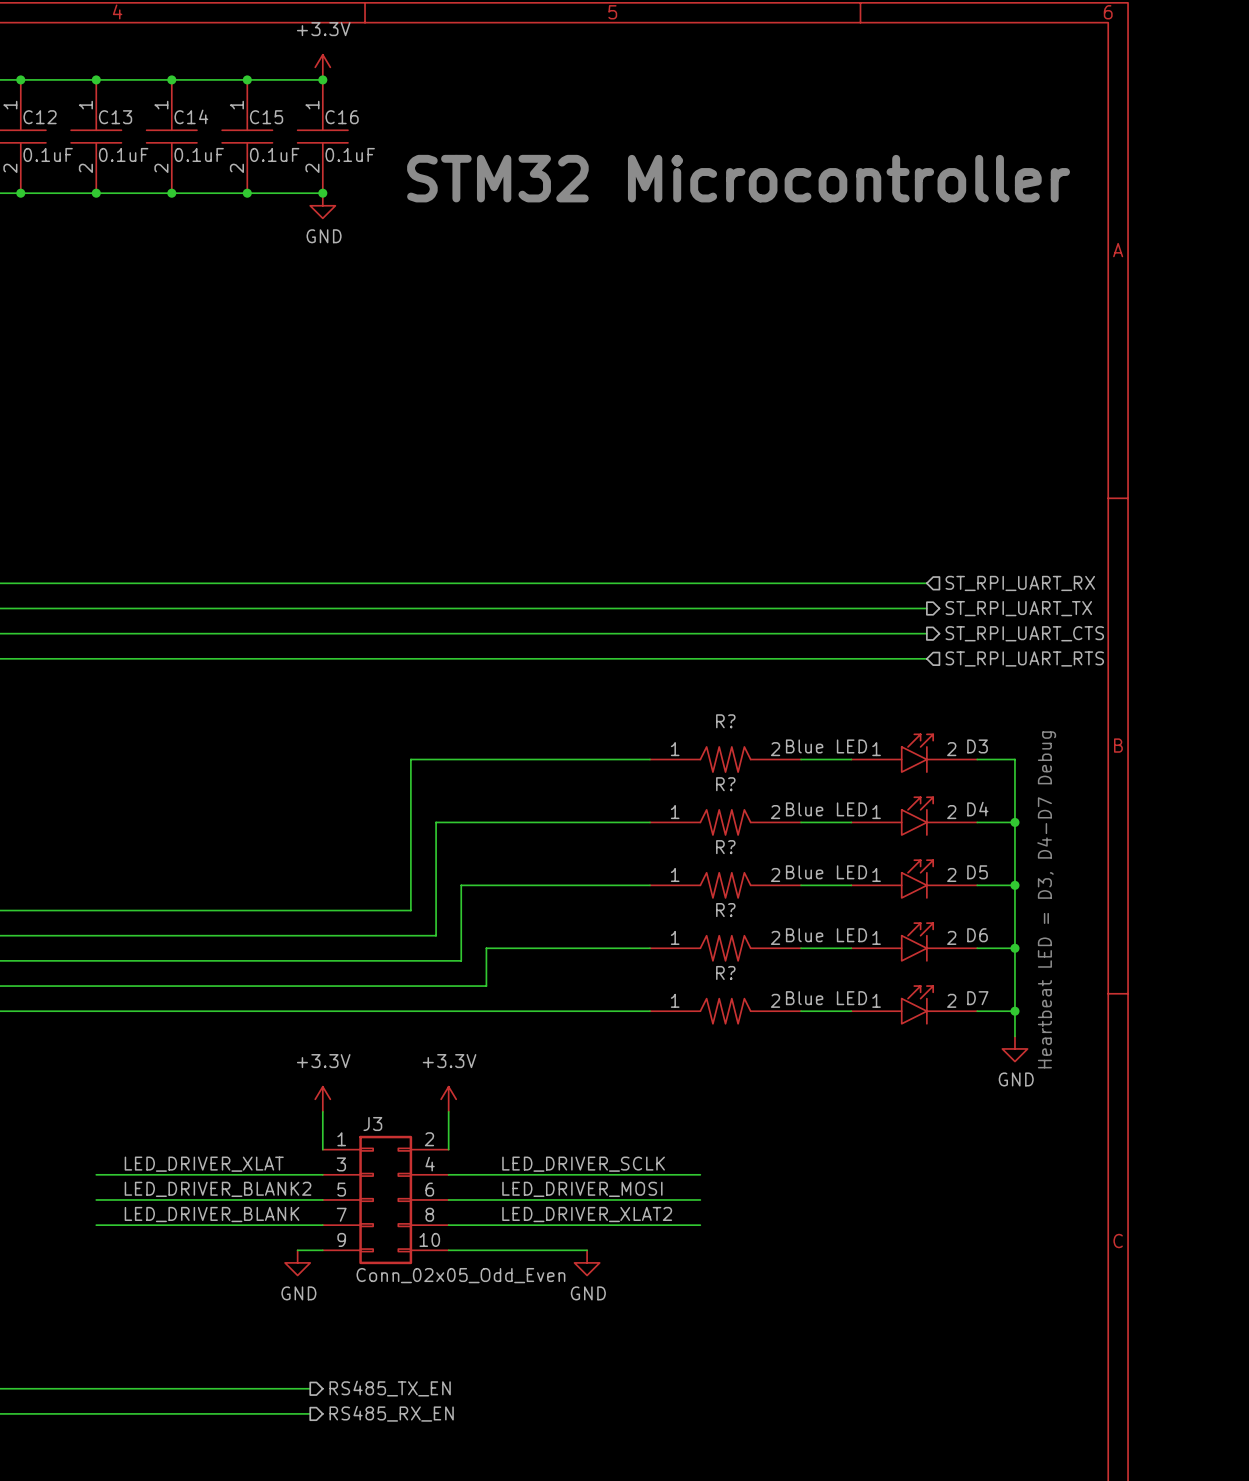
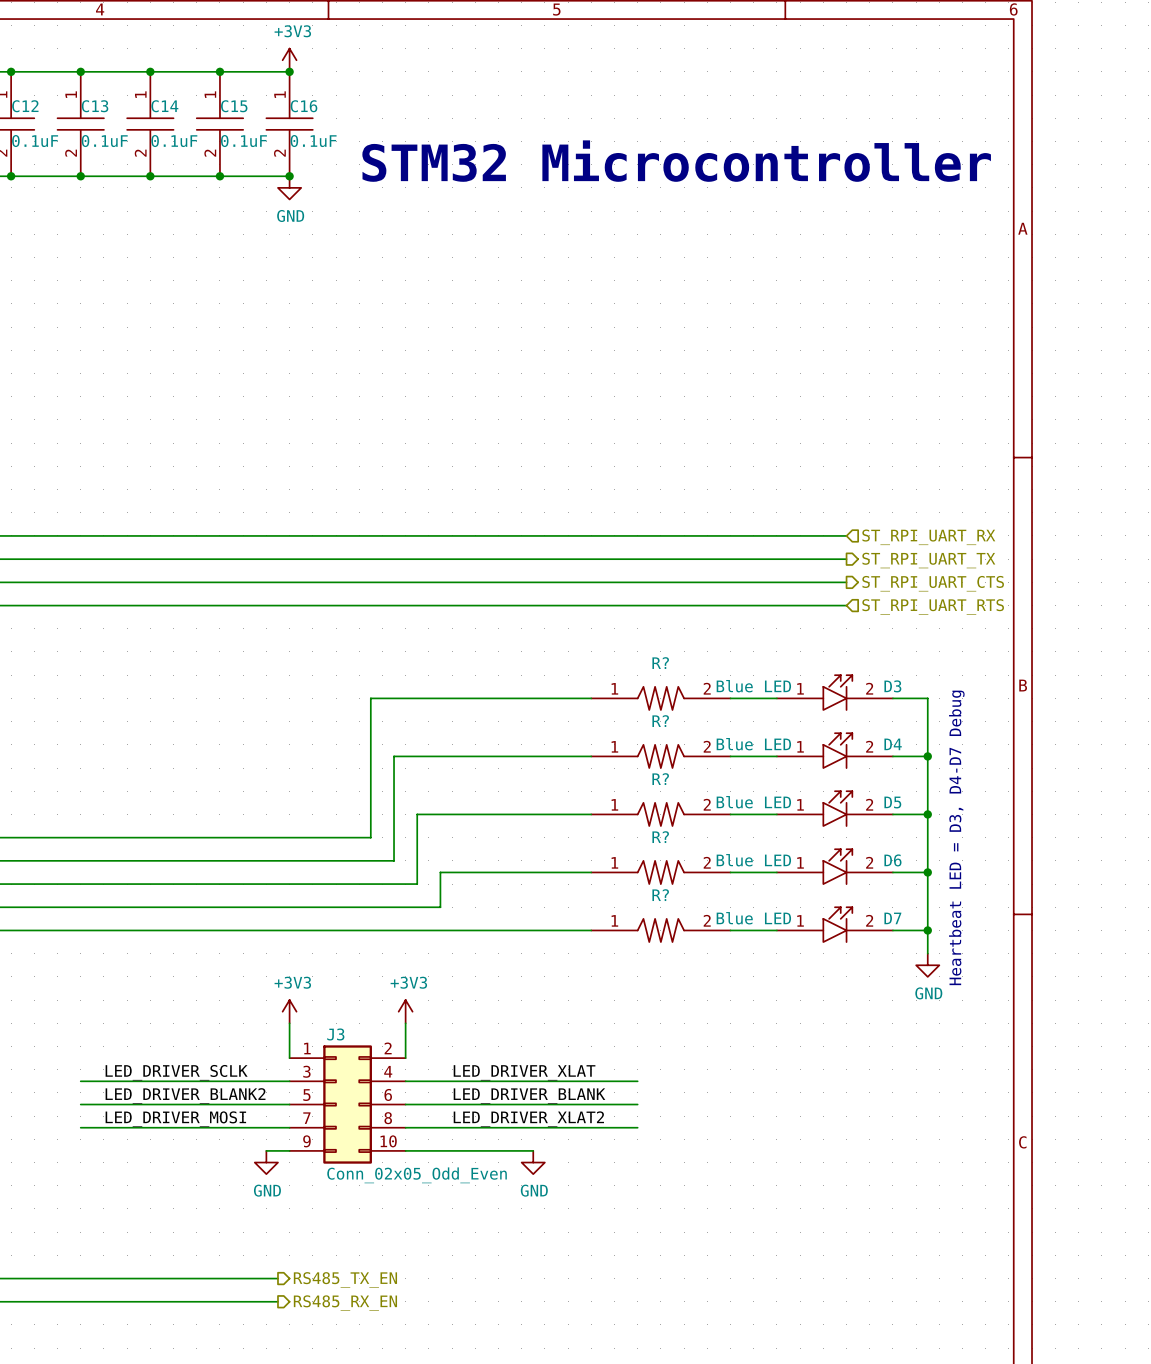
power symbol: +3.3V (322, 67) -> +3V3 (289, 60)
power symbol: +3.3V (322, 1099) -> +3V3 (289, 1011)
power symbol: +3.3V (448, 1099) -> +3V3 (405, 1011)
label: LED_DRIVER_XLAT (204, 1164) -> LED_DRIVER_SCLK (176, 1072)
label: LED_DRIVER_SCLK (583, 1164) -> LED_DRIVER_XLAT (524, 1072)
label: LED_DRIVER_MOSI (582, 1189) -> LED_DRIVER_BLANK (529, 1096)
label: LED_DRIVER_BLANK (212, 1214) -> LED_DRIVER_MOSI (175, 1119)

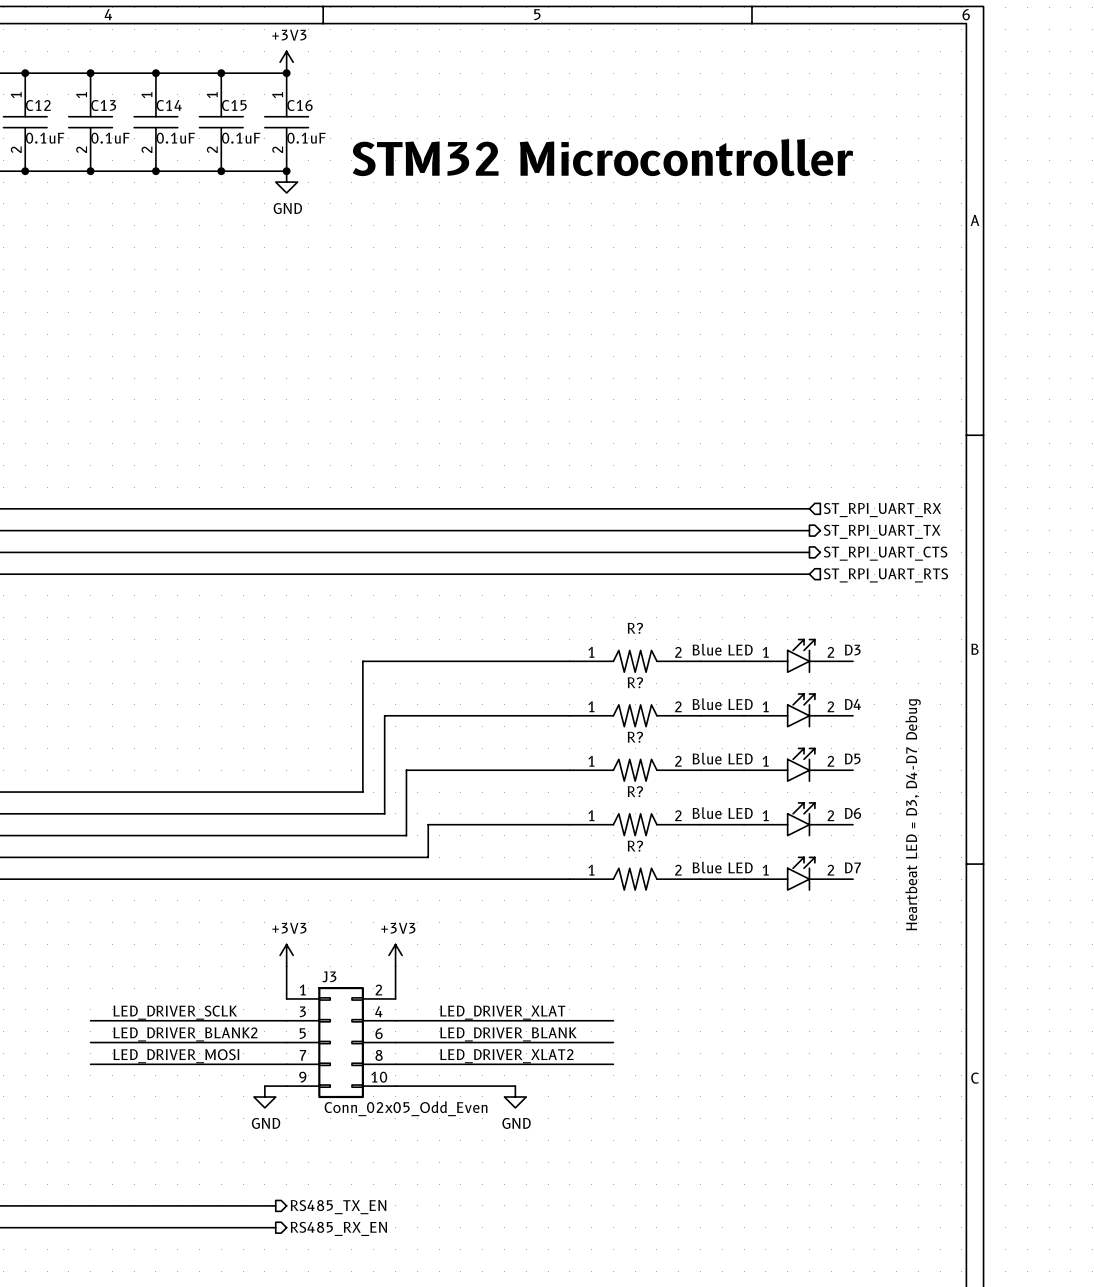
wire: (892, 698) (927, 698) (927, 953) -> none
wire: (892, 756) (927, 756) -> none
junction: (927, 756) -> none
wire: (892, 814) (927, 814) -> none
junction: (927, 814) -> none
wire: (892, 872) (927, 872) -> none
junction: (927, 872) -> none
wire: (892, 930) (927, 930) -> none
junction: (927, 930) -> none
power symbol: GND (927, 965) -> none

